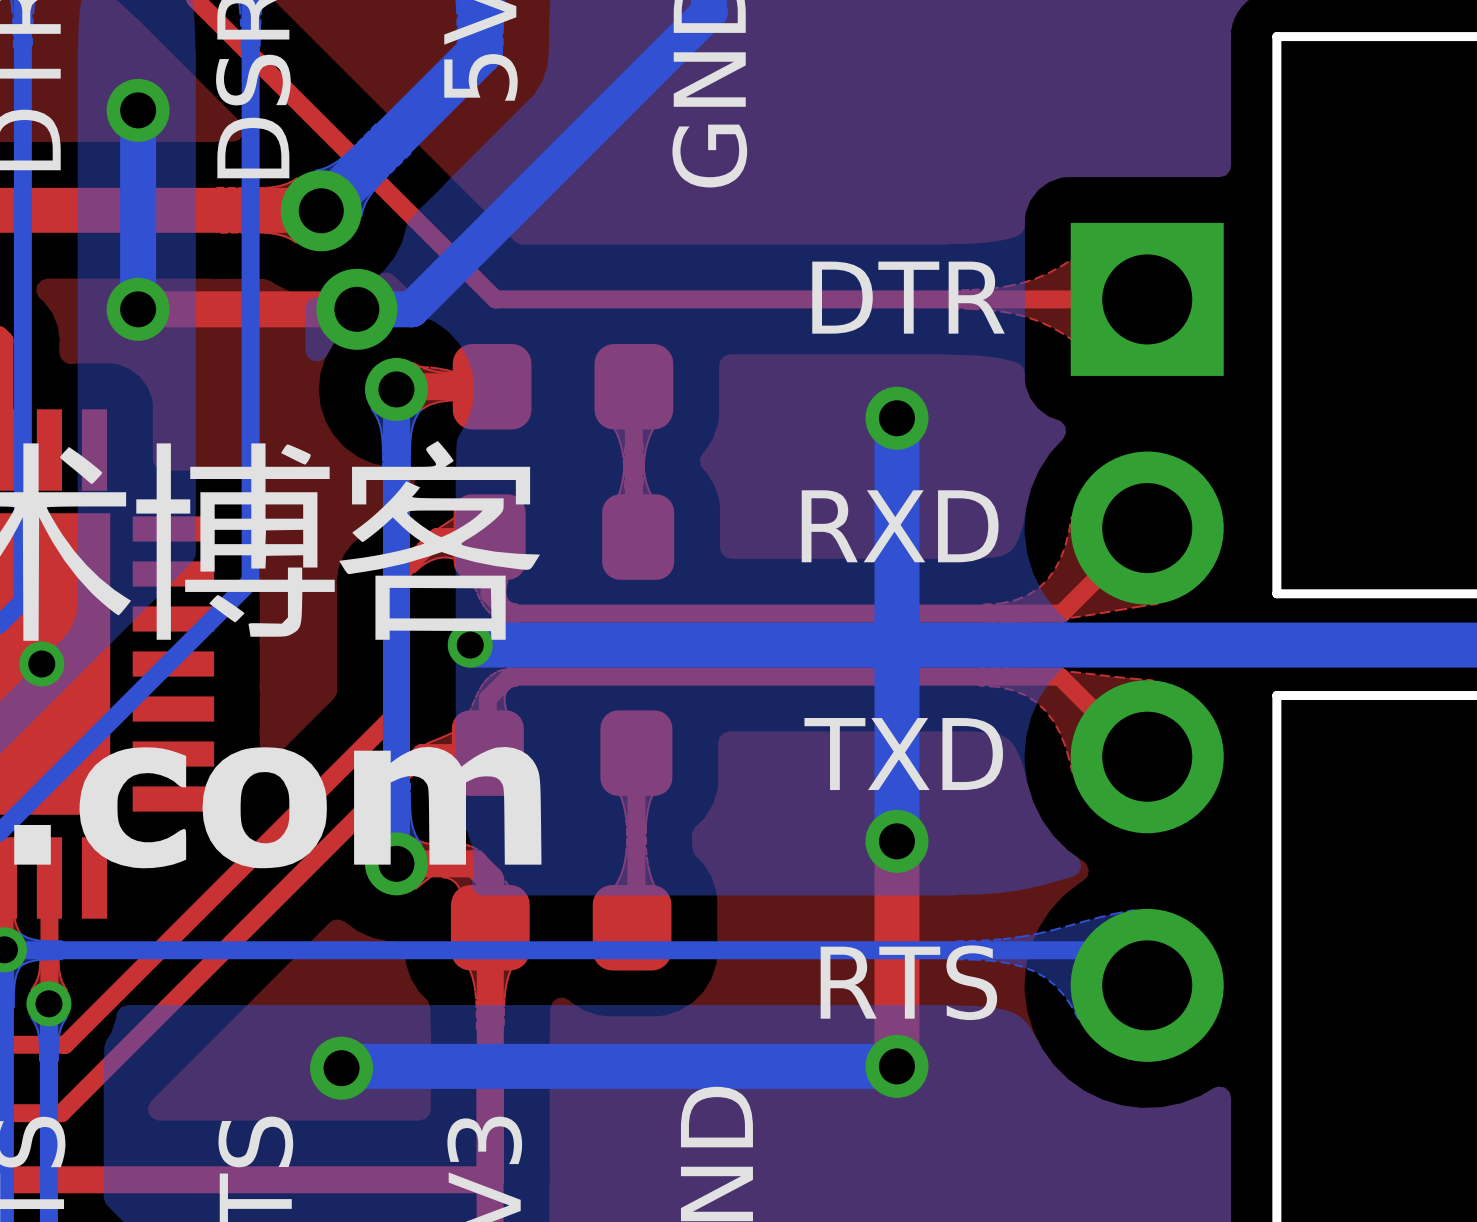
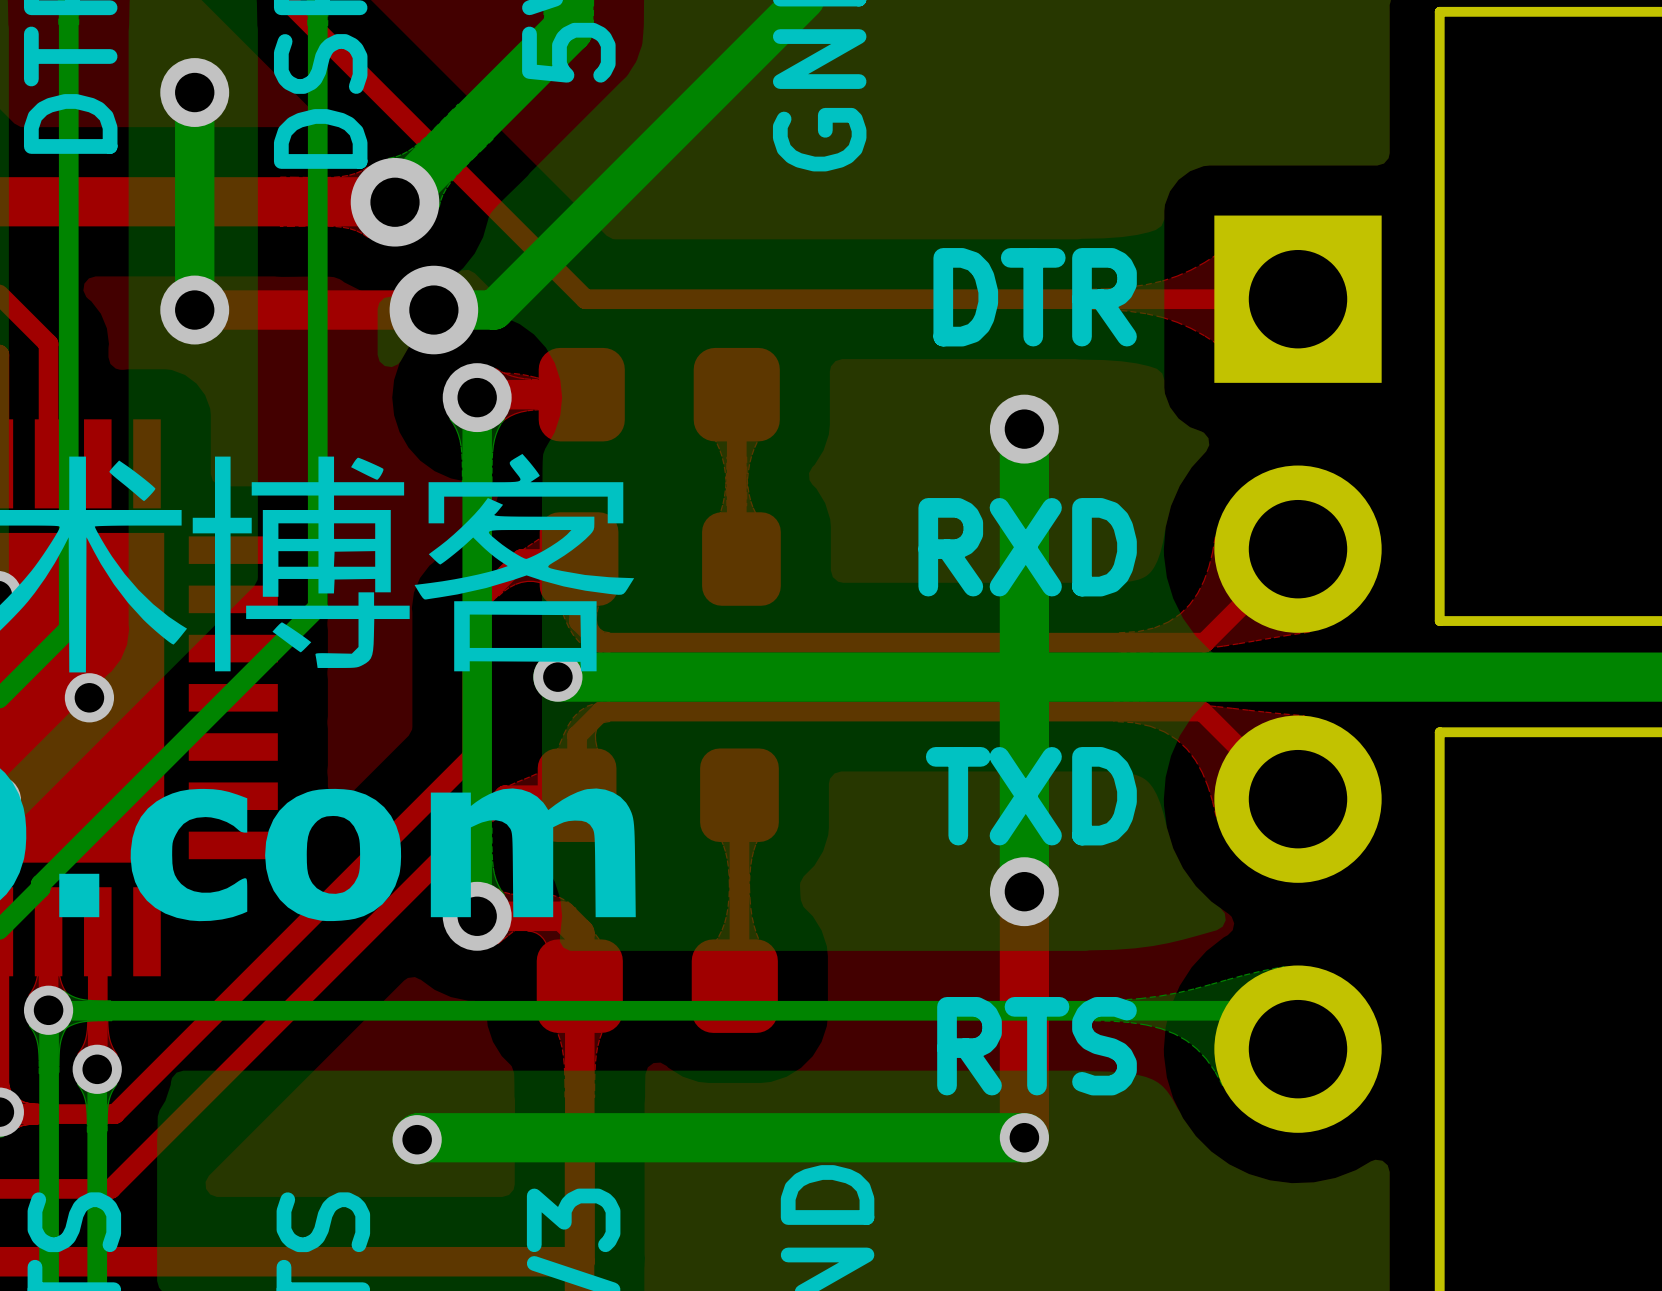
via size: [865, 1034, 929, 1098] -> [999, 1113, 1050, 1163]
via size: [310, 1036, 374, 1100] -> [392, 1115, 442, 1165]

